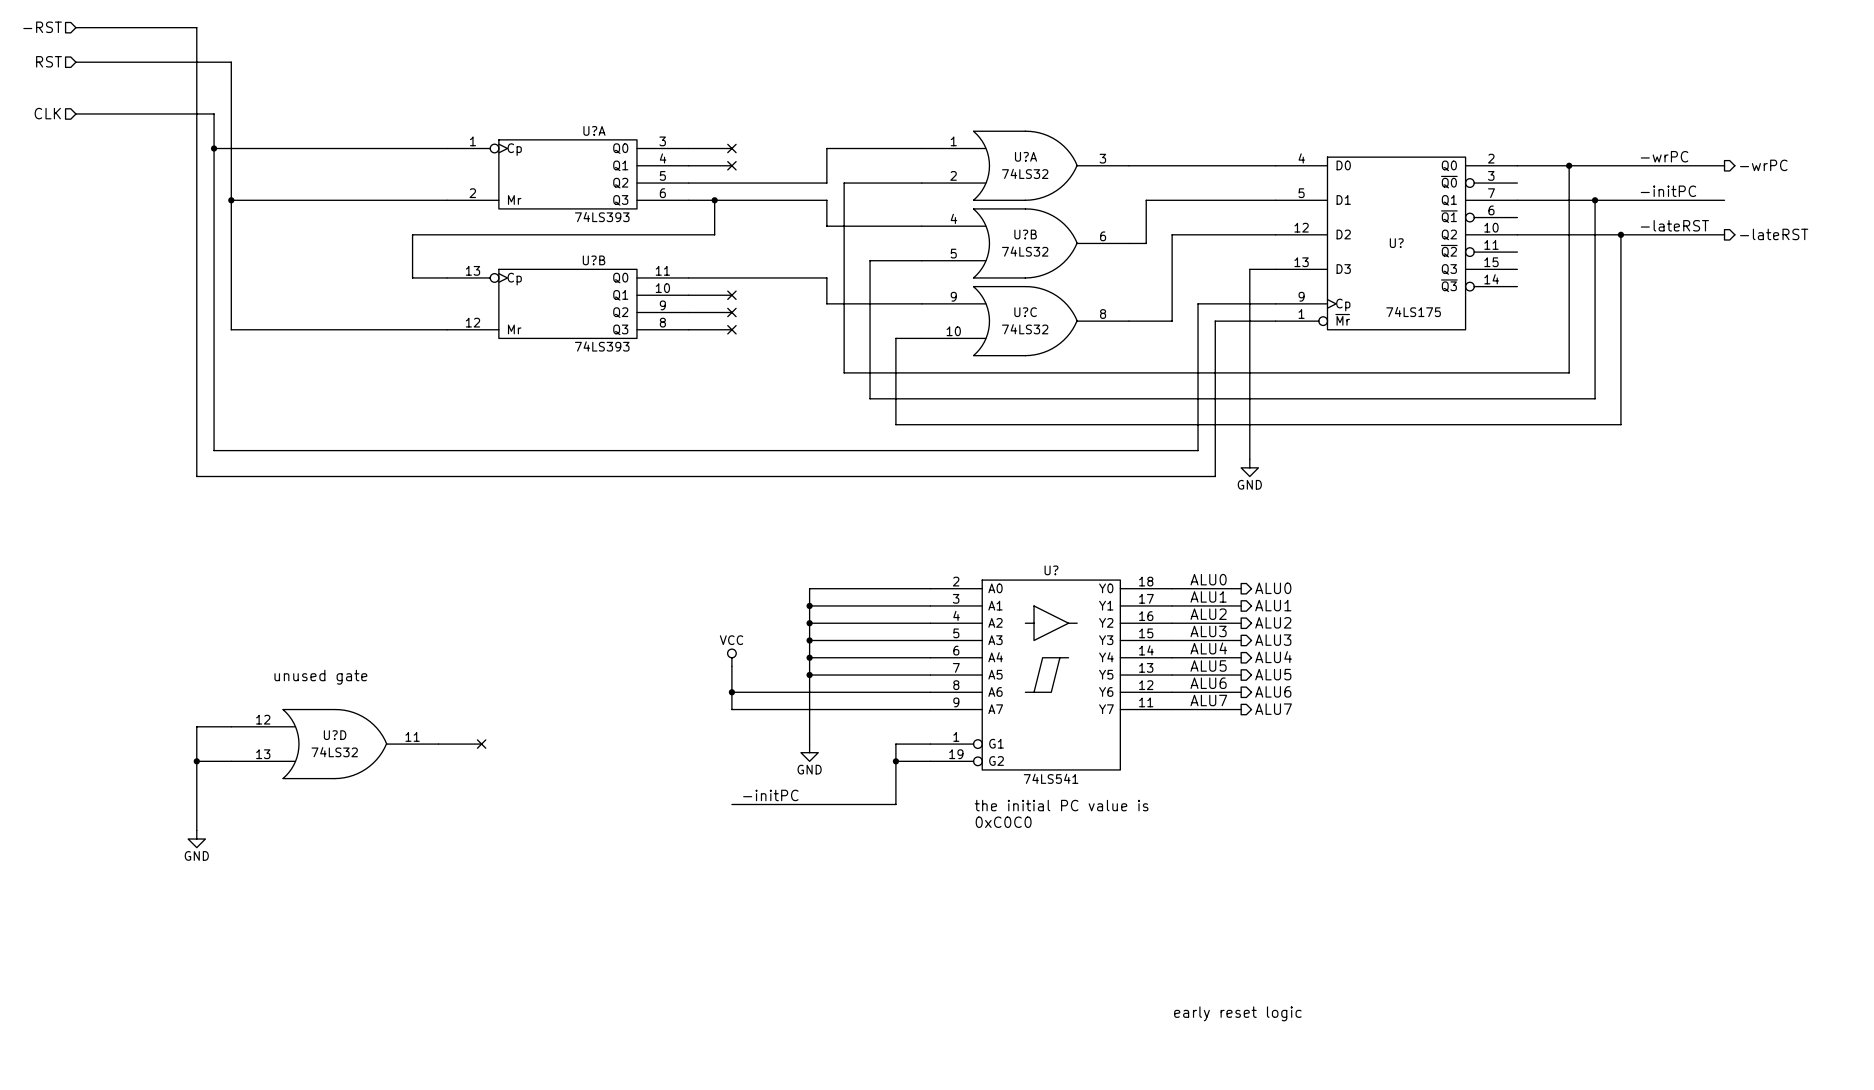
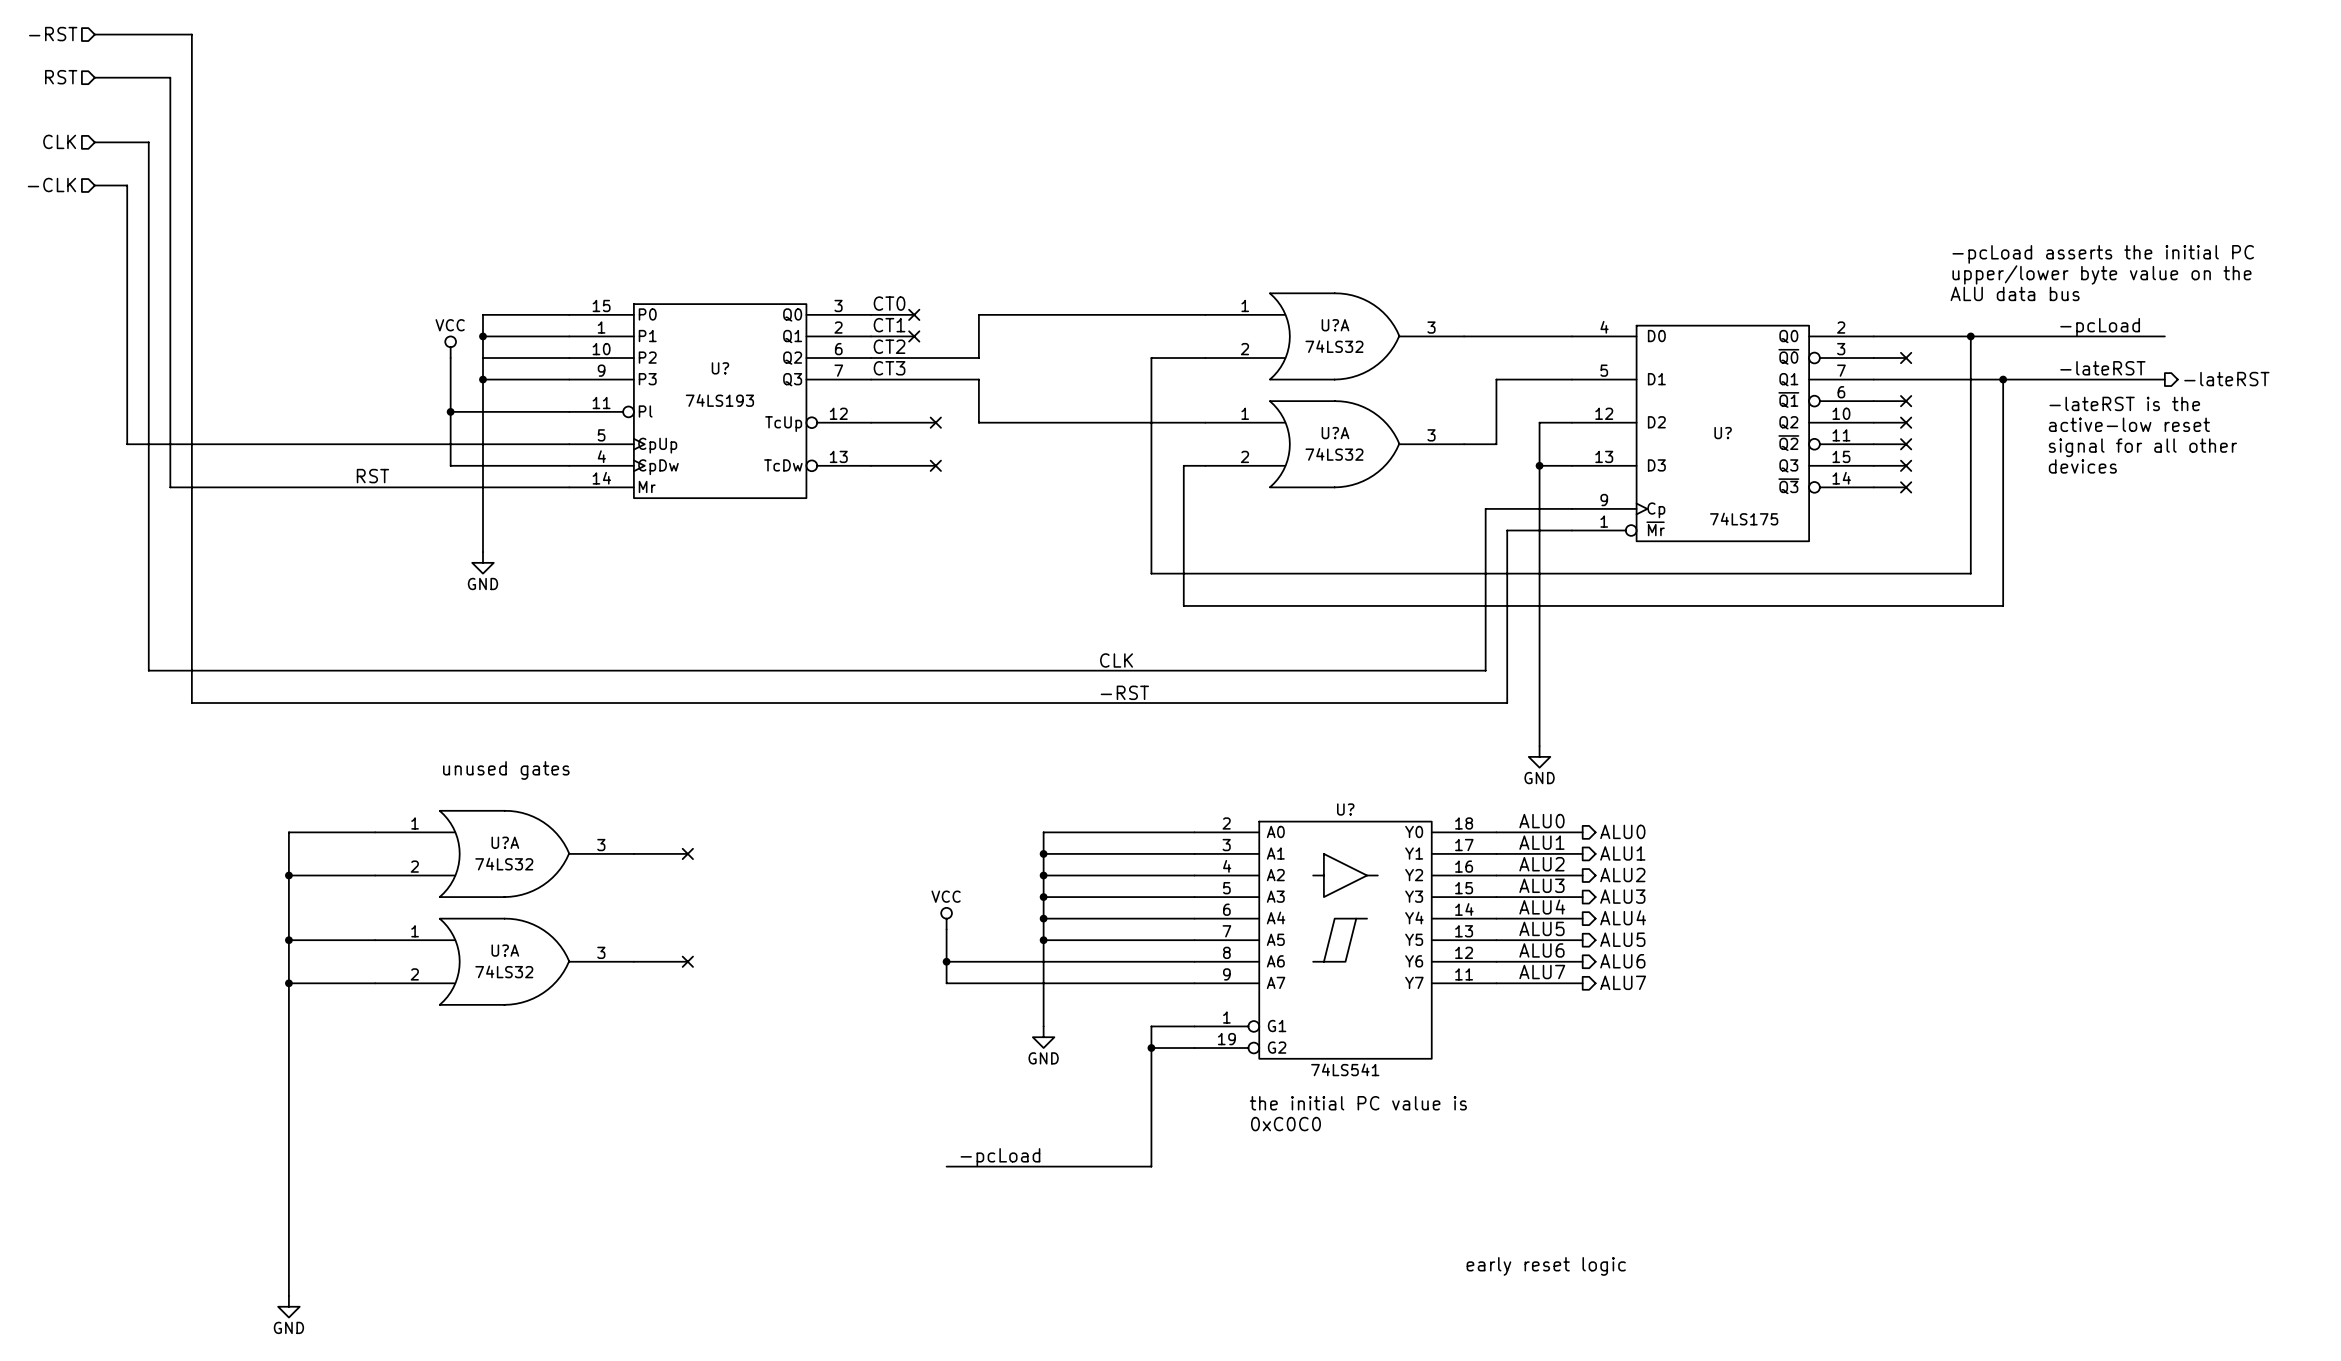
wire: (153, 27) (196, 27) (196, 476) (1215, 476) (1215, 321) (1275, 321) -> (191, 34) (191, 703) (1507, 703) (1507, 530)
wire: (136, 62) (231, 62) (231, 329) (360, 329) -> (170, 77) (170, 487) (569, 487)
wire: (119, 113) (214, 113) (214, 450) (1198, 450) (1198, 355) -> (148, 142) (148, 670) (1485, 670) (1485, 508) (1571, 508)
hierarchical label: none -> -CLK (51, 185)
wire: none -> (94, 185) (127, 185) (127, 444) (569, 444)
wire: (214, 148) (447, 148) -> none
junction: (214, 148) -> none
wire: (688, 148) (731, 148) -> none
no-connect mark: (731, 148) -> none
wire: (921, 148) (826, 148) (826, 183) (688, 183) -> none
label: -wrPC (1664, 156) -> none
wire: (688, 165) (731, 165) -> none
no-connect mark: (731, 165) -> none
U?A: 74LS32 (1025, 165) -> none
wire: (1128, 165) (1275, 165) -> none
wire: (1517, 165) (1724, 165) -> none
wire: (1569, 165) (1569, 372) (1526, 372) -> none
junction: (1569, 165) -> none
hierarchical label: -wrPC (1763, 165) -> none
U?A: 74LS393 (567, 174) -> none
wire: (921, 183) (844, 183) (844, 372) (947, 372) -> (2003, 379) (2003, 605) (1183, 605) (1183, 465)
label: -initPC (1668, 191) -> none
wire: (231, 200) (447, 200) -> none
junction: (231, 200) -> none
wire: (688, 200) (826, 200) (826, 226) (921, 226) -> none
wire: (714, 200) (714, 234) (412, 234) (412, 277) (447, 277) -> none
junction: (714, 200) -> none
wire: (1275, 200) (1146, 200) (1146, 243) (1128, 243) -> none
wire: (1517, 200) (1724, 200) -> none
wire: (1595, 200) (1595, 398) (870, 398) (870, 260) (921, 260) -> none
junction: (1595, 200) -> none
text: none -> -pcLoad asserts the initial PC (2103, 254)
text: none -> upper/lower byte value on the (2101, 274)
label position: -lateRST (1674, 225) -> -lateRST (2102, 368)
wire: (1275, 234) (1172, 234) (1172, 321) (1128, 321) -> none
wire: (1517, 234) (1724, 234) -> none
wire: (1620, 234) (1620, 424) (1258, 424) -> none
junction: (1620, 234) -> none
hierarchical label position: -lateRST (1774, 234) -> -lateRST (2226, 379)
text: none -> ALU data bus (2015, 293)
label: none -> CT0 (889, 303)
U?B: 74LS32 (1025, 243) -> none
U? position: (1396, 243) -> (1722, 433)
wire: none -> (569, 314) (482, 314) (482, 552)
wire: none -> (871, 314) (914, 314)
no-connect mark: none -> (914, 314)
wire: none -> (1205, 314) (978, 314) (978, 358) (871, 358)
label: none -> CT1 (889, 325)
label: none -> -pcLoad (2100, 327)
wire: none -> (482, 336) (569, 336)
junction: none -> (482, 336)
wire: none -> (871, 336) (914, 336)
no-connect mark: none -> (914, 336)
U?A: none -> 74LS32 (1334, 336)
wire: (1249, 269) (1249, 459) -> (1561, 336) (1464, 336)
wire: none -> (1873, 336) (2164, 336)
wire: none -> (1970, 336) (1970, 573) (1151, 573) (1151, 358) (1205, 358)
junction: none -> (1970, 336)
power symbol: none -> VCC (450, 347)
wire: (688, 277) (826, 277) (826, 303) (921, 303) -> none
label: none -> CT2 (889, 346)
wire: none -> (450, 358) (450, 465) (569, 465)
wire: none -> (482, 358) (569, 358)
no-connect mark: none -> (1906, 358)
label: none -> CT3 (889, 368)
wire: (688, 295) (731, 295) -> none
no-connect mark: (731, 295) -> none
wire: none -> (482, 379) (569, 379)
junction: none -> (482, 379)
U?B: 74LS393 (567, 303) -> none
wire: none -> (1873, 379) (2164, 379)
junction: none -> (2003, 379)
wire: (688, 312) (731, 312) -> none
no-connect mark: (731, 312) -> none
U?: none -> 74LS193 (720, 401)
U?C: 74LS32 (1025, 321) -> none
wire: none -> (1873, 401) (1906, 401)
no-connect mark: none -> (1906, 401)
text: none -> -lateRST is the (2124, 403)
junction: none -> (450, 411)
wire: (688, 329) (731, 329) -> none
no-connect mark: (731, 329) -> none
wire: none -> (871, 422) (935, 422)
no-connect mark: none -> (935, 422)
wire: (895, 338) (895, 424) (1206, 424) -> (1119, 422) (978, 422) (978, 379) (871, 379)
wire: none -> (1571, 422) (1539, 422) (1539, 746)
wire: none -> (1873, 422) (1906, 422)
no-connect mark: none -> (1906, 422)
text: none -> active-low reset (2129, 424)
U?A: none -> 74LS32 (1334, 444)
wire: none -> (1464, 444) (1496, 444)
wire: none -> (1873, 444) (1906, 444)
no-connect mark: none -> (1906, 444)
text: none -> signal for all other (2142, 447)
wire: none -> (871, 465) (935, 465)
no-connect mark: none -> (935, 465)
wire: (964, 372) (1232, 372) -> none
junction: none -> (1539, 465)
wire: (1258, 372) (1500, 372) -> none
no-connect mark: none -> (1906, 465)
text: none -> devices (2082, 466)
label: none -> RST (372, 476)
wire: none -> (1873, 487) (1906, 487)
no-connect mark: none -> (1906, 487)
power symbol: none -> GND (482, 562)
power symbol position: GND (1249, 467) -> GND (1539, 756)
text: none -> CLK (1116, 660)
text: none -> -RST (1124, 692)
label position: ALU0 (1208, 579) -> ALU0 (1541, 821)
wire: (930, 588) (809, 588) (809, 744) -> (1194, 832) (1043, 832) (1043, 1026)
wire: (1172, 588) (1241, 588) -> (1496, 832) (1582, 832)
hierarchical label position: ALU0 (1273, 588) -> ALU0 (1622, 831)
label position: ALU1 (1208, 596) -> ALU1 (1541, 842)
wire: (809, 605) (930, 605) -> (1043, 853) (1194, 853)
junction: (809, 605) -> none
wire: (1172, 605) (1241, 605) -> (1496, 853) (1582, 853)
hierarchical label position: ALU1 (1273, 605) -> ALU1 (1622, 853)
label position: ALU2 (1208, 614) -> ALU2 (1541, 864)
text: none -> unused gates (506, 770)
hierarchical label position: ALU2 (1273, 622) -> ALU2 (1622, 875)
wire: (809, 623) (930, 623) -> (1043, 875) (1194, 875)
junction: (809, 623) -> none
wire: (1172, 623) (1241, 623) -> (1496, 875) (1582, 875)
label position: ALU3 (1208, 631) -> ALU3 (1541, 885)
wire: (809, 640) (930, 640) -> (1043, 897) (1194, 897)
junction: (809, 640) -> none
wire: (1172, 640) (1241, 640) -> (1496, 897) (1582, 897)
hierarchical label position: ALU3 (1273, 640) -> ALU3 (1622, 896)
label position: ALU4 (1208, 648) -> ALU4 (1542, 907)
power symbol position: VCC (731, 657) -> VCC (946, 918)
wire: (809, 657) (930, 657) -> (1043, 918) (1194, 918)
junction: (809, 657) -> none
wire: (1172, 657) (1241, 657) -> (1496, 918) (1582, 918)
hierarchical label position: ALU4 (1273, 657) -> ALU4 (1623, 917)
label position: ALU5 (1208, 665) -> ALU5 (1541, 928)
wire: none -> (375, 832) (288, 832) (288, 1295)
wire: (731, 666) (731, 709) (930, 709) -> (946, 929) (946, 983) (1194, 983)
hierarchical label position: ALU5 (1273, 674) -> ALU5 (1622, 939)
wire: (809, 675) (930, 675) -> (1043, 940) (1194, 940)
junction: (809, 675) -> none
U? position: (1051, 675) -> (1345, 940)
wire: (1172, 675) (1241, 675) -> (1496, 940) (1582, 940)
text: unused gate (320, 677) -> none
U?A: none -> 74LS32 (504, 853)
wire: none -> (633, 853) (687, 853)
no-connect mark: none -> (687, 853)
junction: none -> (1043, 853)
label position: ALU6 (1208, 683) -> ALU6 (1541, 950)
hierarchical label position: ALU6 (1273, 691) -> ALU6 (1622, 961)
wire: (731, 692) (930, 692) -> (946, 961) (1194, 961)
junction: (731, 692) -> none
wire: (1172, 692) (1241, 692) -> (1496, 961) (1582, 961)
wire: none -> (288, 875) (375, 875)
junction: none -> (288, 875)
junction: none -> (1043, 875)
label position: ALU7 (1208, 700) -> ALU7 (1542, 972)
wire: (1172, 709) (1241, 709) -> (1496, 983) (1582, 983)
hierarchical label position: ALU7 (1273, 709) -> ALU7 (1623, 982)
junction: none -> (1043, 897)
wire: (231, 726) (196, 726) (196, 830) -> none
junction: none -> (1043, 918)
U?D: 74LS32 (334, 744) -> none
wire: (438, 744) (481, 744) -> (633, 961) (687, 961)
no-connect mark: (481, 744) -> none
wire: (930, 744) (895, 744) (895, 804) (731, 804) -> none
wire: none -> (288, 940) (375, 940)
junction: none -> (288, 940)
power symbol position: GND (809, 752) -> GND (1043, 1037)
junction: none -> (1043, 940)
wire: (196, 761) (231, 761) -> none
junction: (196, 761) -> none
wire: (895, 761) (930, 761) -> (1151, 1048) (1194, 1048)
junction: (895, 761) -> none
U?A: none -> 74LS32 (504, 961)
no-connect mark: none -> (687, 961)
junction: none -> (946, 961)
wire: none -> (288, 983) (375, 983)
junction: none -> (288, 983)
label: -initPC (770, 795) -> none
text position: the initial PC value is (1061, 805) -> the initial PC value is (1358, 1103)
wire: none -> (1194, 1026) (1151, 1026) (1151, 1166) (946, 1166)
text position: 0xC0C0 (1003, 822) -> 0xC0C0 (1285, 1124)
power symbol: GND (196, 839) -> none
junction: none -> (1151, 1048)
label: none -> -pcLoad (1000, 1157)
power symbol: none -> GND (288, 1306)

